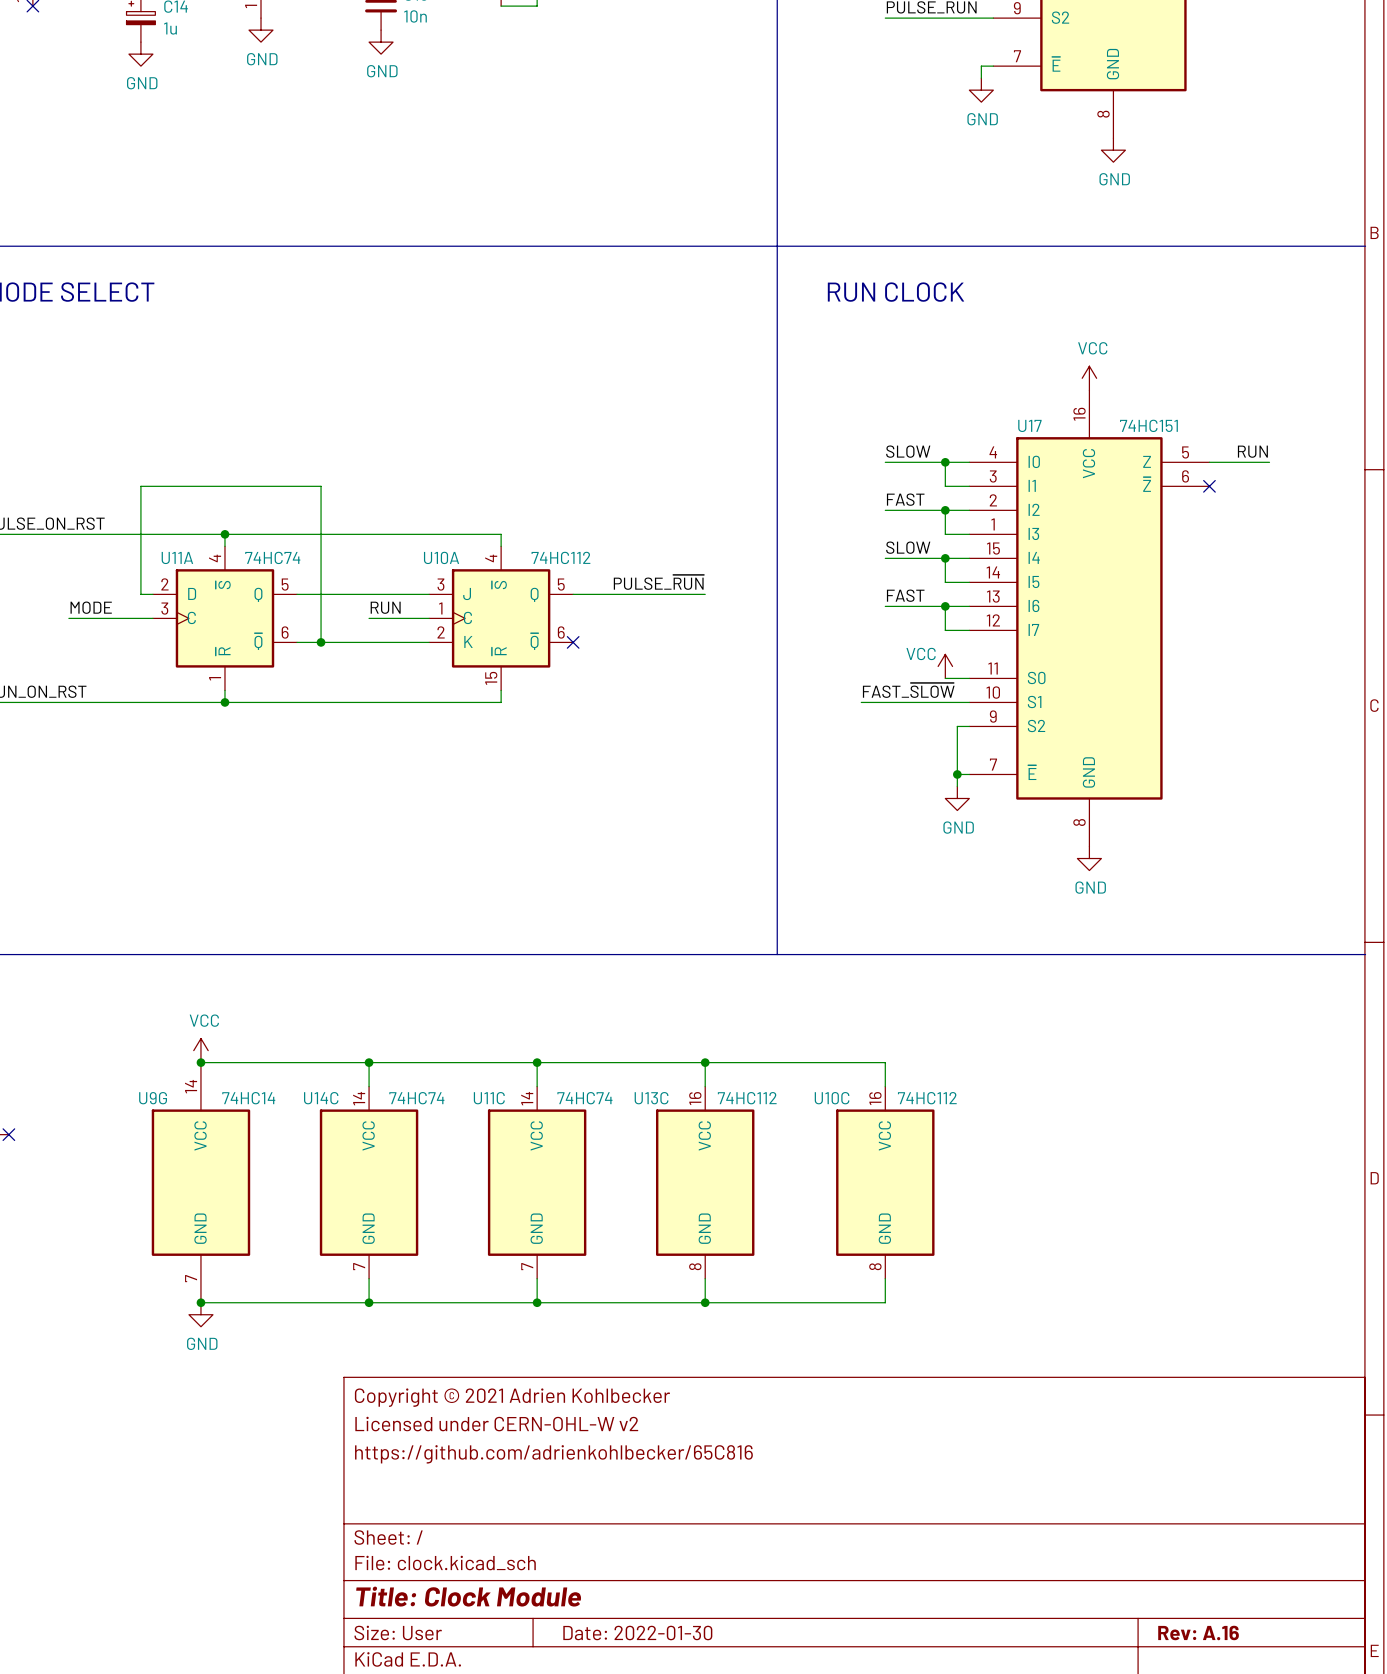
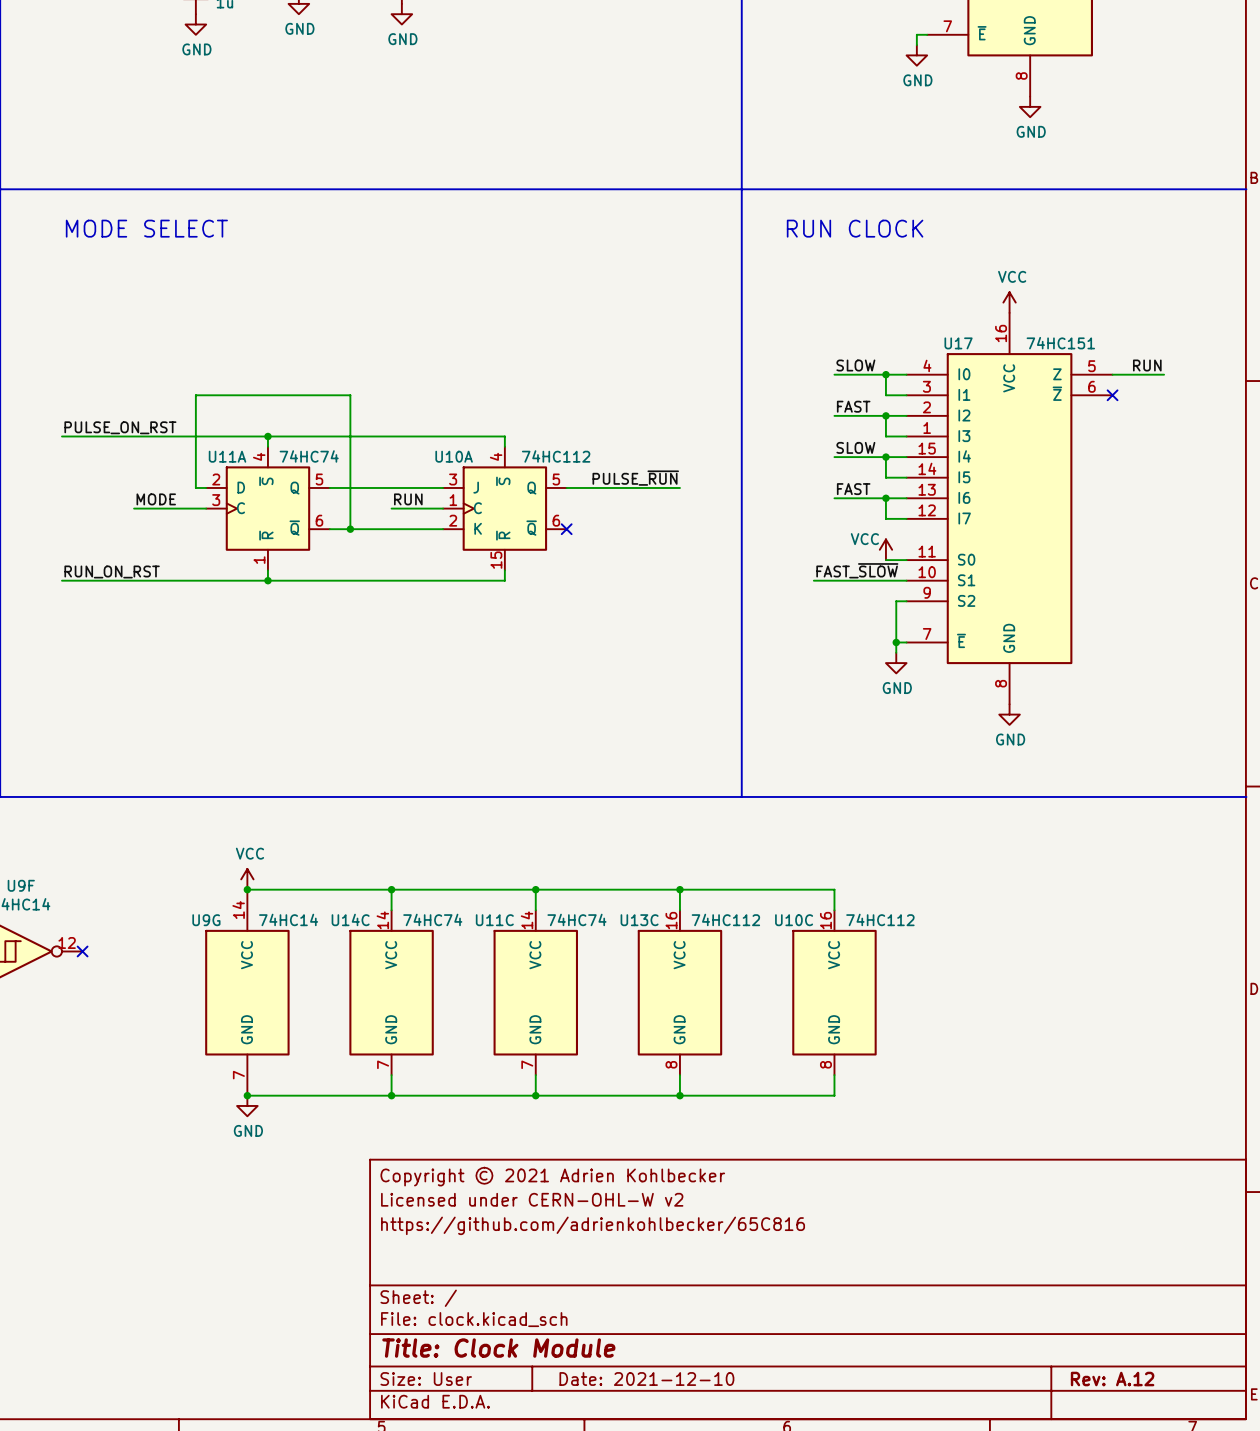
title block: Rev: A.16 (1198, 1632) -> Rev: A.12 (1112, 1379)
title block: Date: 2022-01-30 (637, 1633) -> Date: 2021-12-10 (646, 1379)

